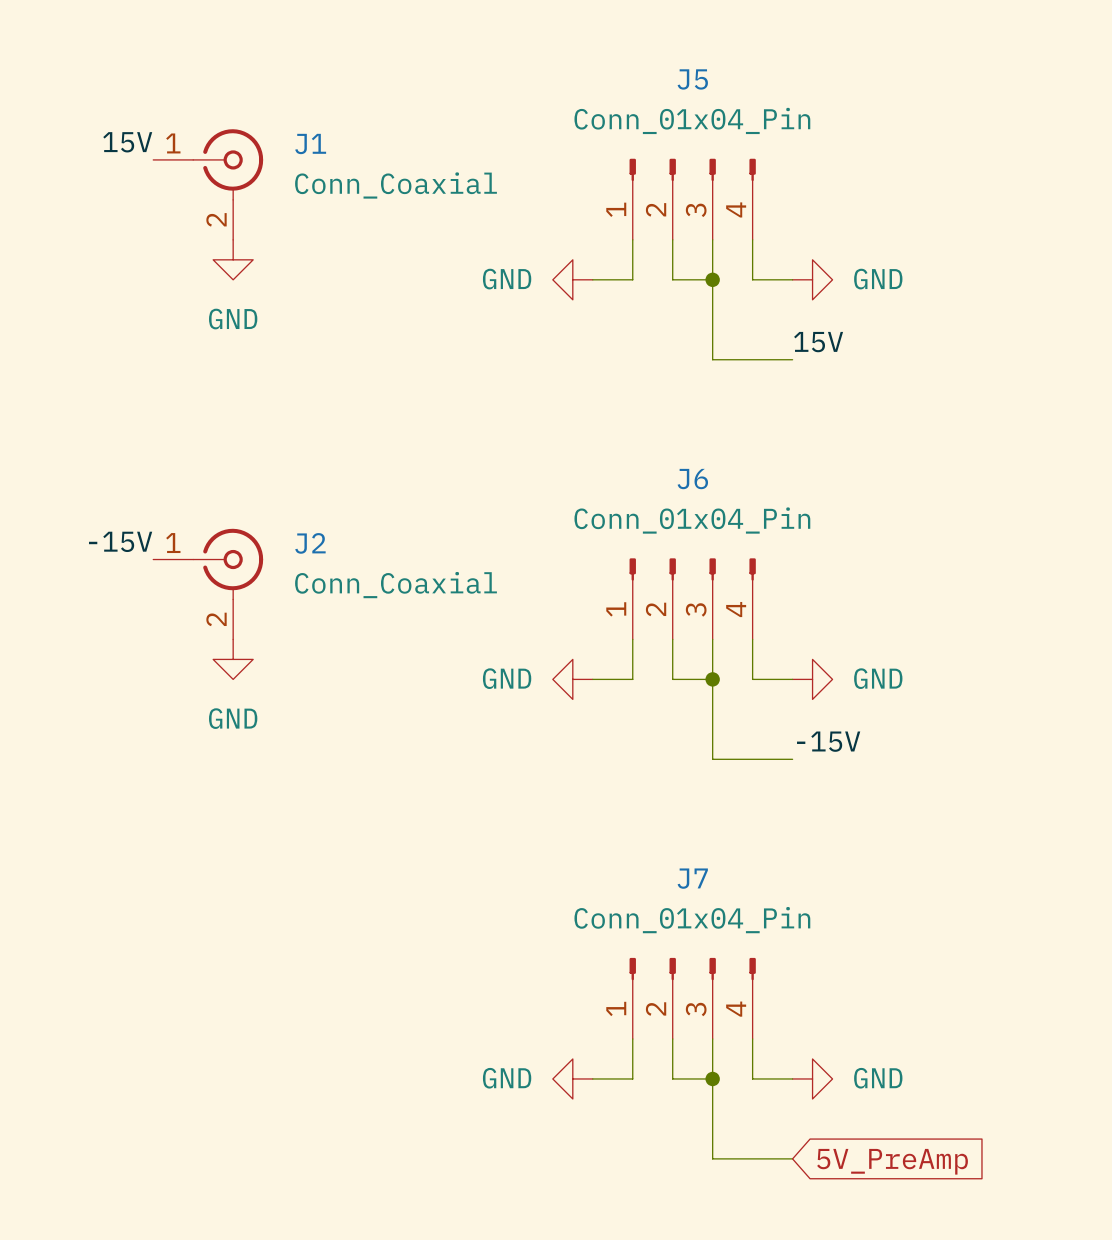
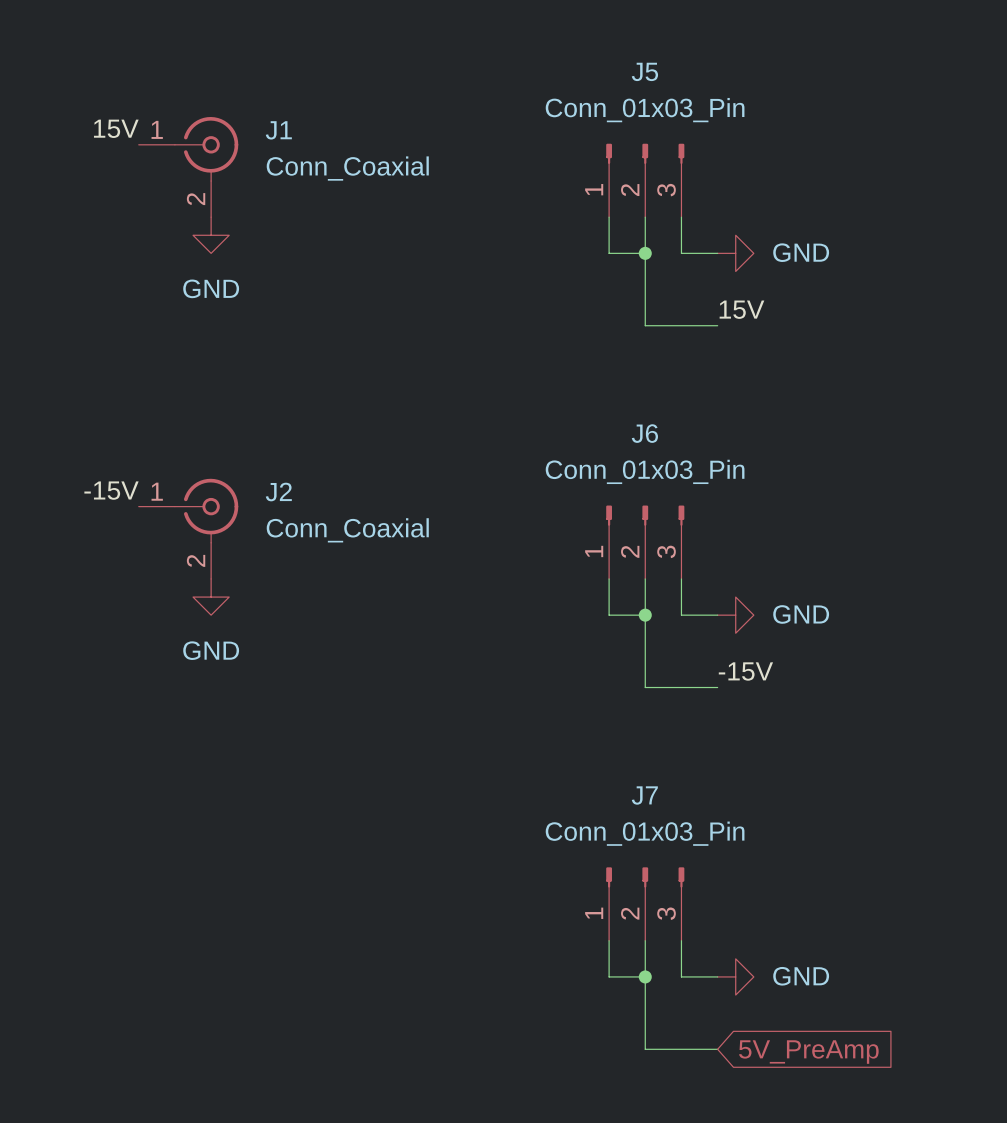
J5 value: Conn_01x04_Pin (692, 120) -> Conn_01x03_Pin (645, 110)
J5 symbol: [629, 158, 756, 240] -> [606, 143, 685, 218]
wire: (632, 239) (632, 279) (592, 279) -> none
power symbol: GND (572, 279) -> none
J6 value: Conn_01x04_Pin (692, 520) -> Conn_01x03_Pin (645, 471)
J6 symbol: [629, 558, 756, 640] -> [606, 505, 685, 579]
wire: (632, 639) (632, 679) (592, 679) -> none
power symbol: GND (572, 679) -> none
J7 value: Conn_01x04_Pin (692, 920) -> Conn_01x03_Pin (645, 833)
J7 symbol: [629, 957, 756, 1040] -> [606, 867, 685, 941]
wire: (632, 1039) (632, 1078) (592, 1078) -> none
power symbol: GND (572, 1078) -> none

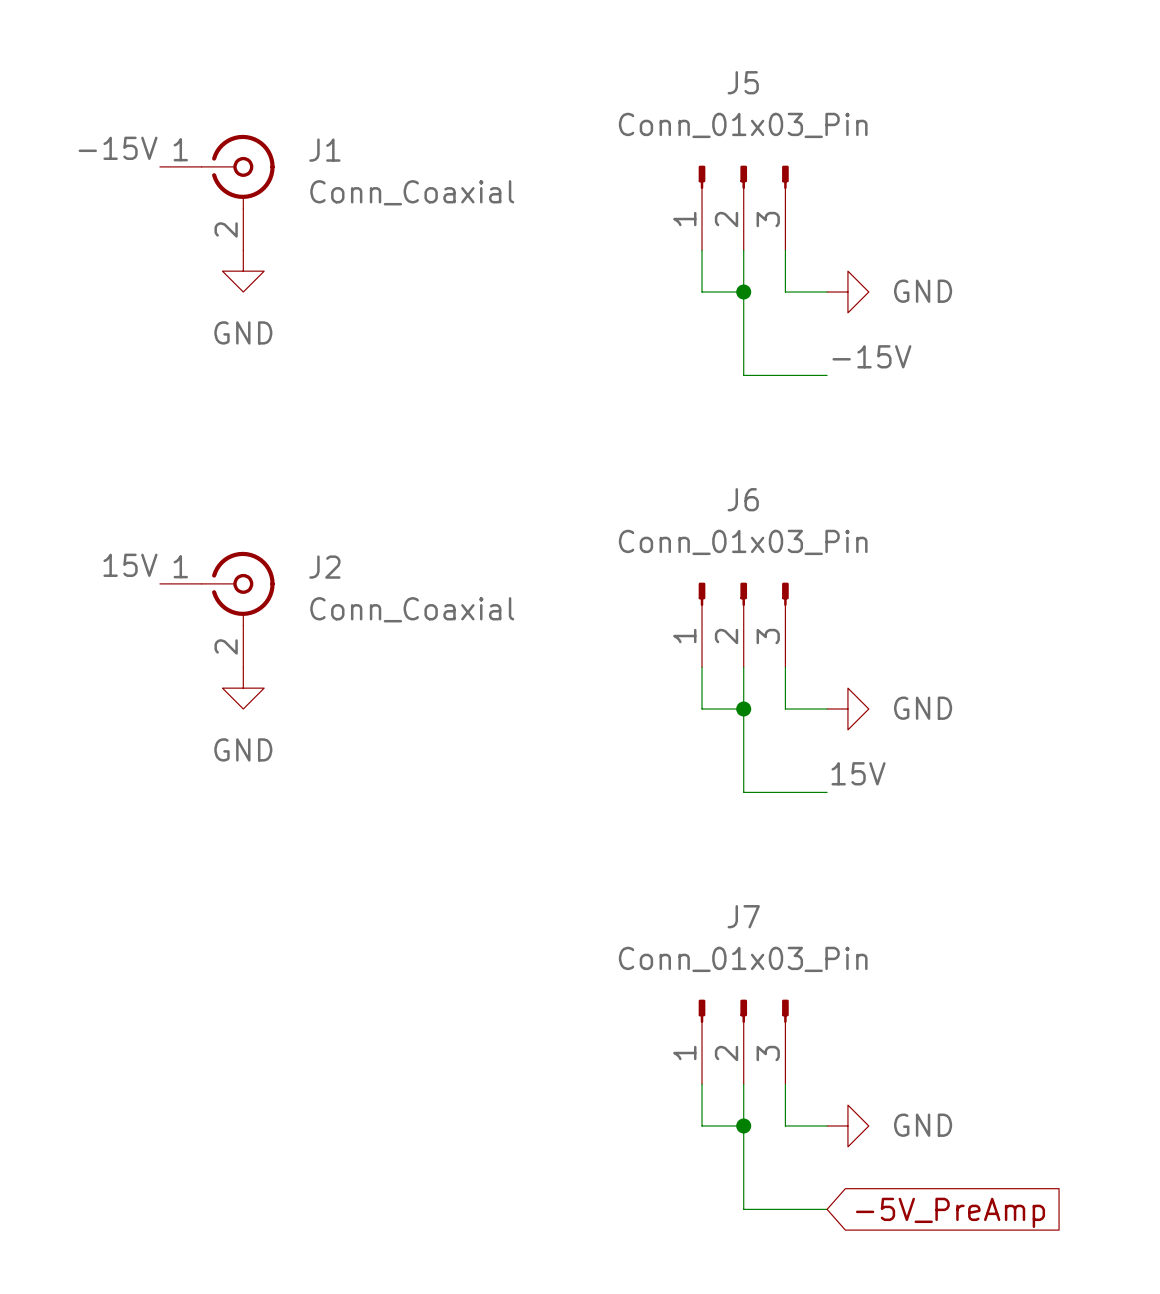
label: 15V (116, 128) -> -15V (118, 148)
label: 15V (741, 309) -> -15V (871, 356)
label: -15V (111, 490) -> 15V (130, 565)
label: -15V (745, 671) -> 15V (858, 773)
global label: 5V_PreAmp (808, 1052) -> -5V_PreAmp (950, 1212)

